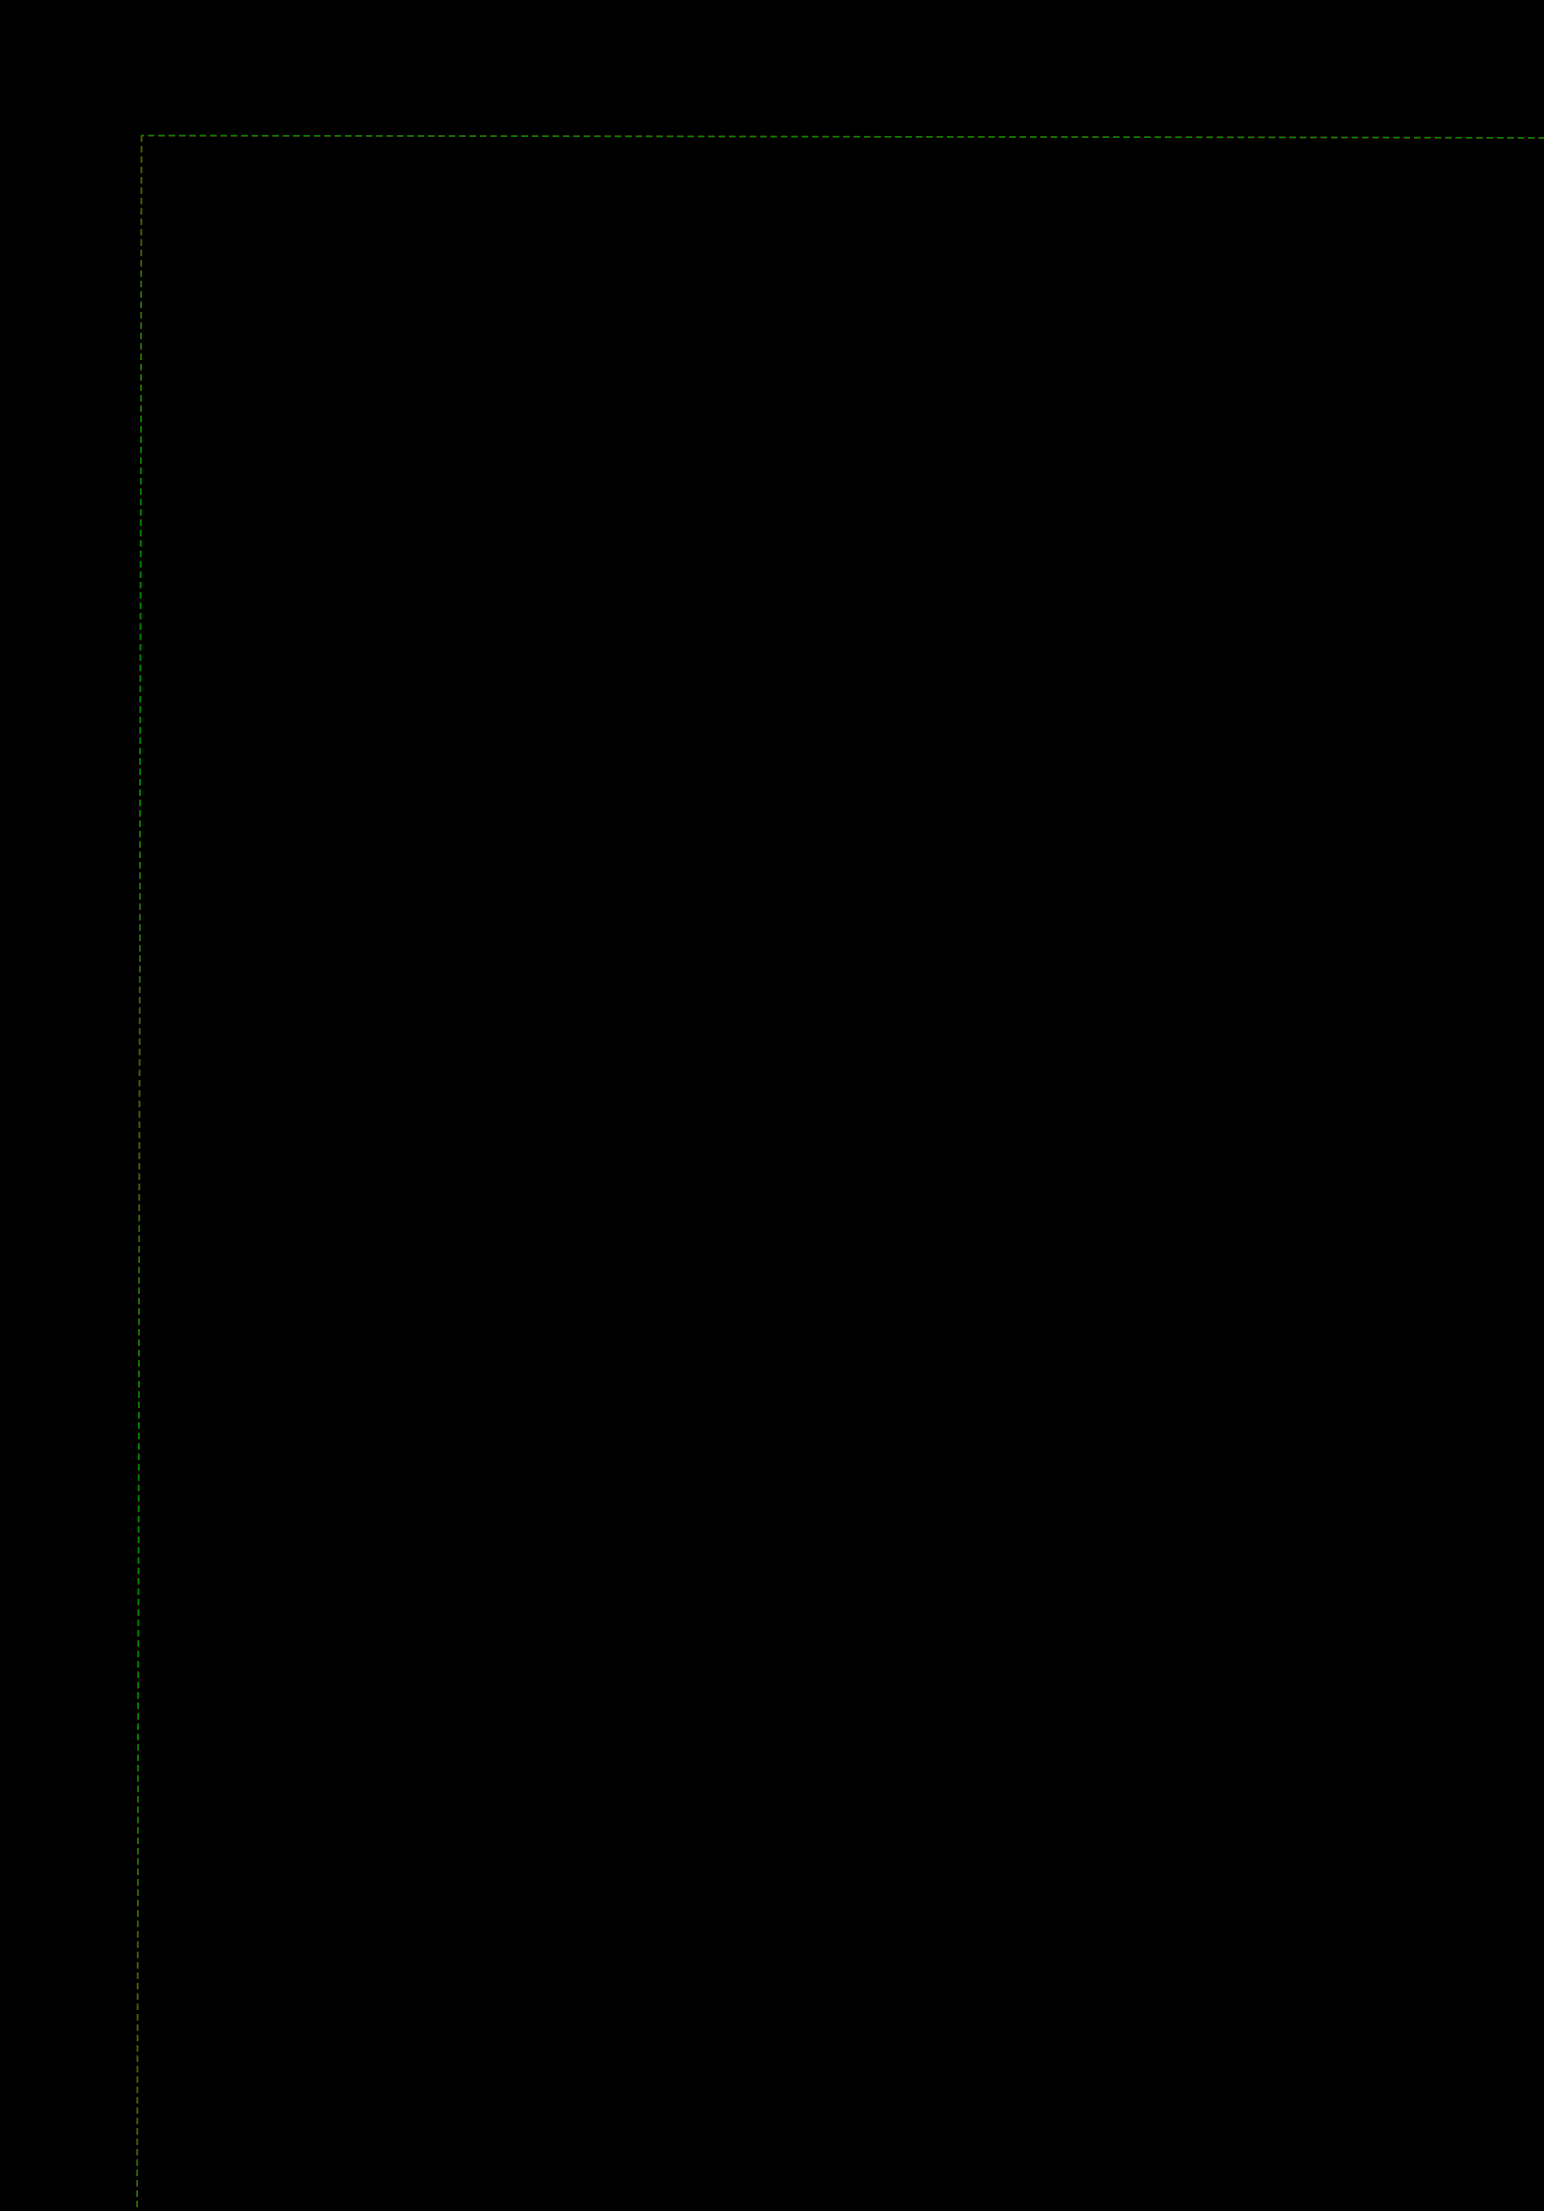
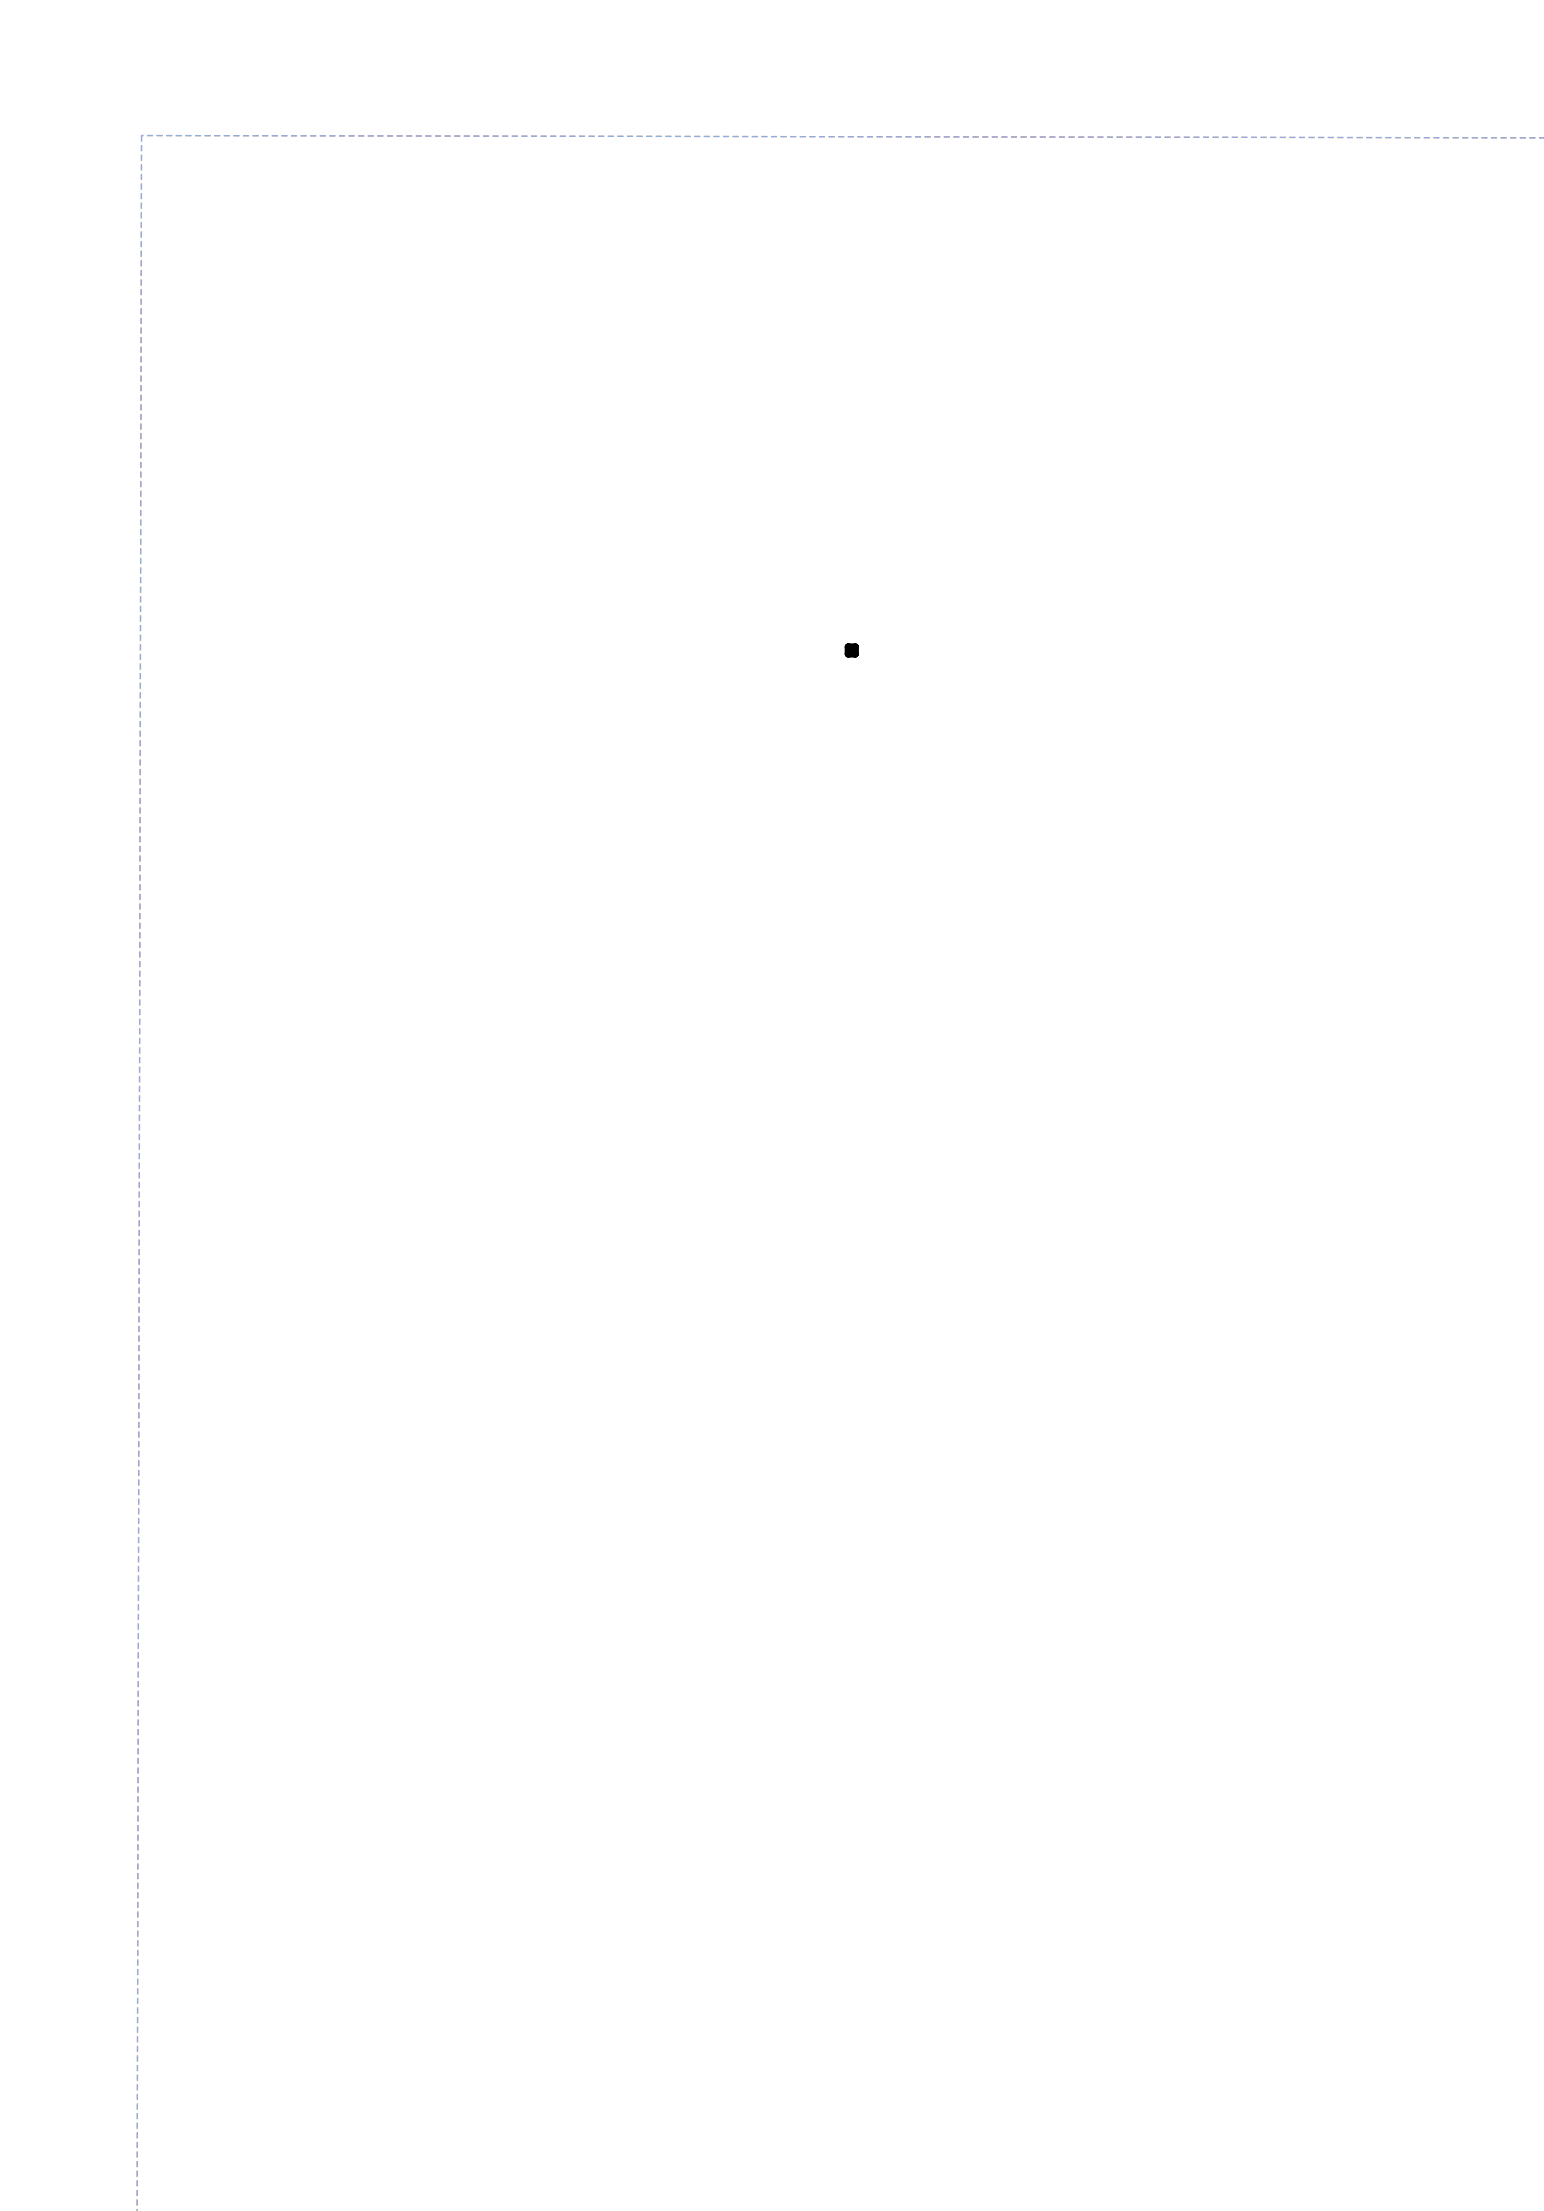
board edge: none -> (855, 646) (848, 646) (848, 654) (855, 654) (855, 646)

